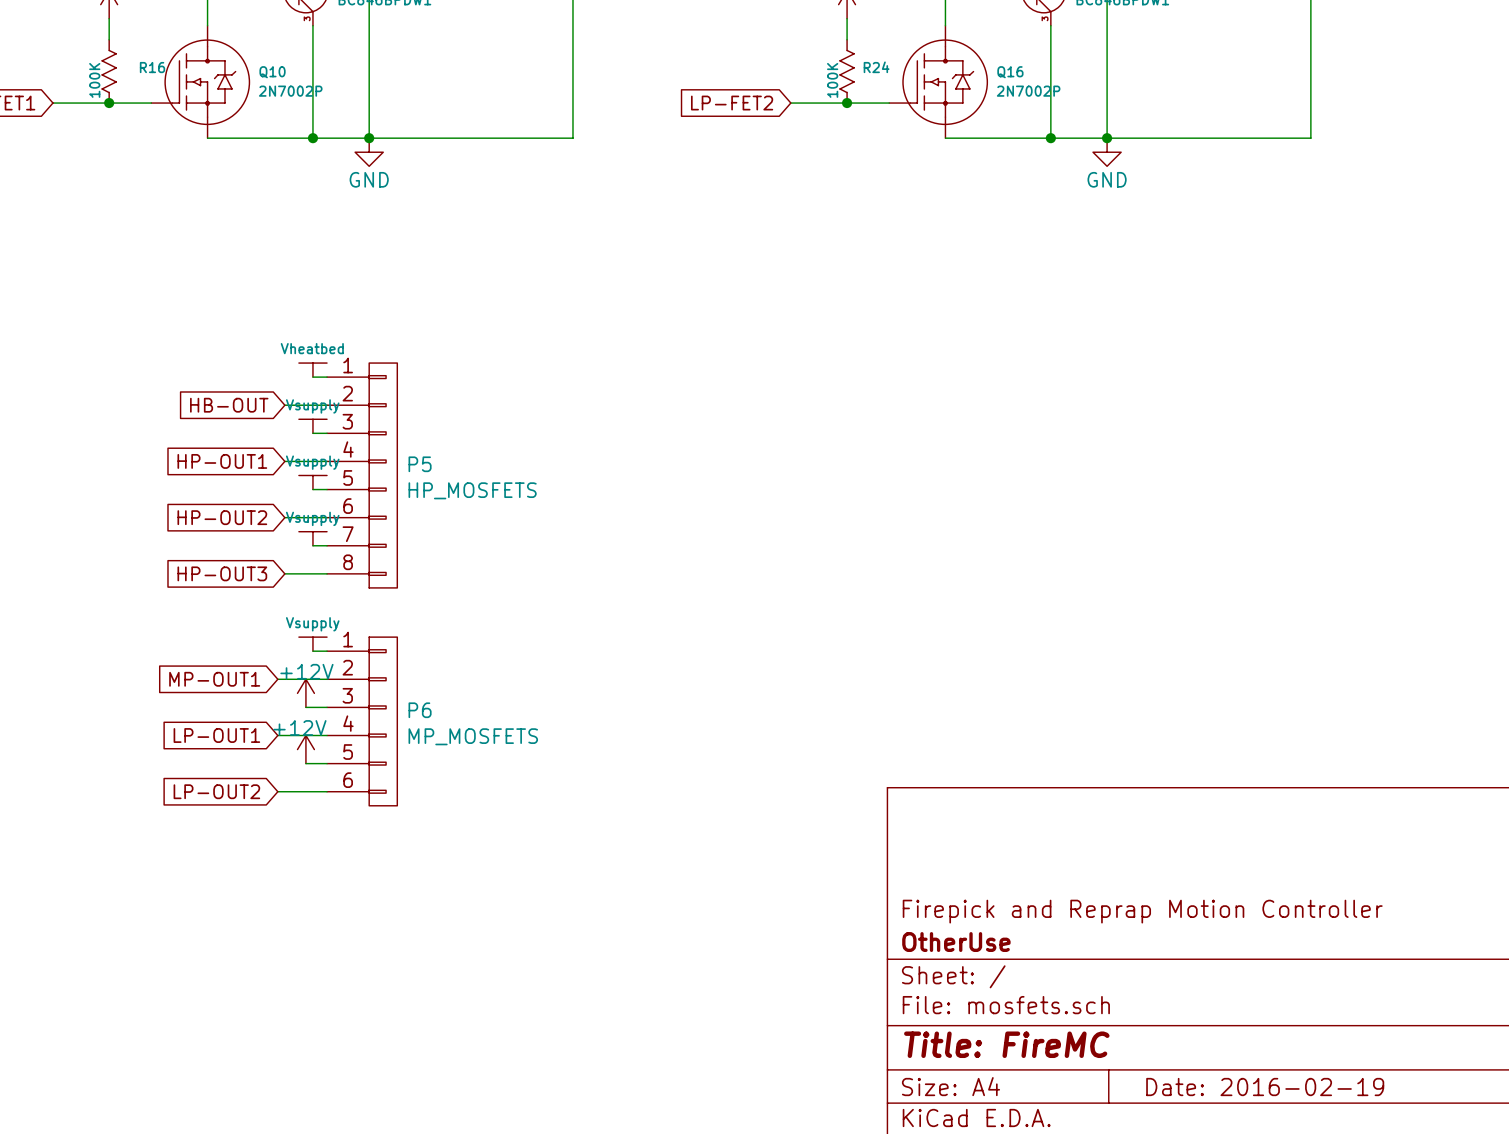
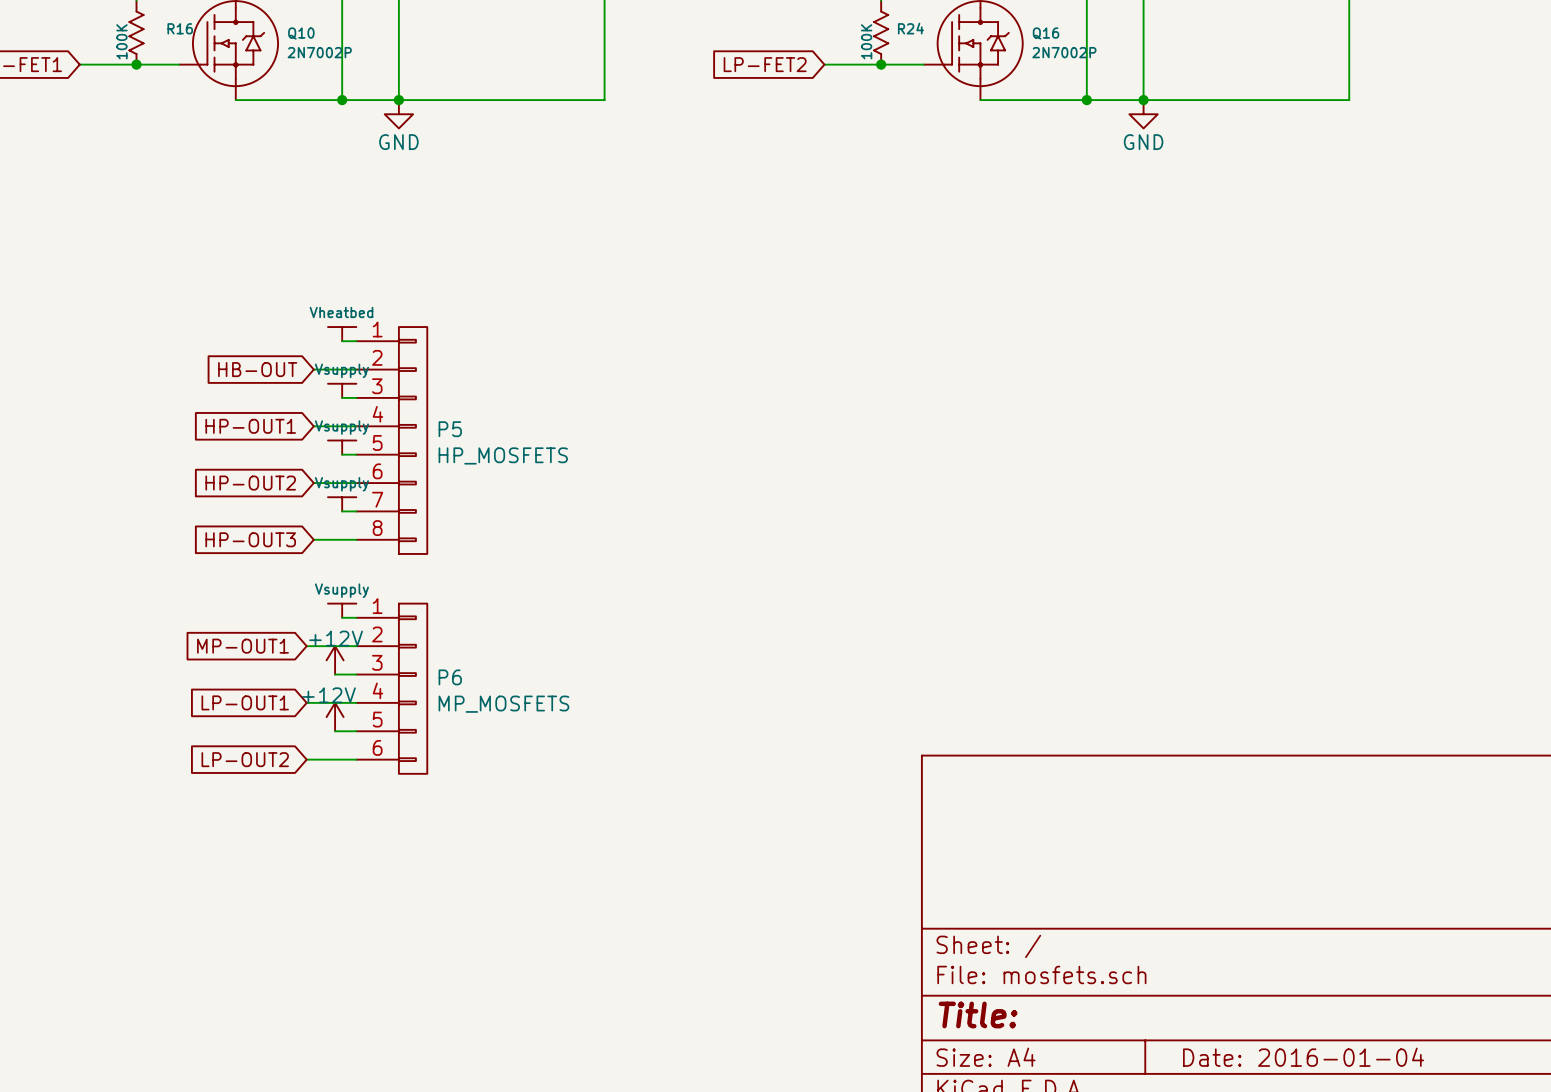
title block: Firepick and Reprap Motion Controller (1142, 911) -> none
title block: OtherUse (956, 942) -> none
title block: Title: FireMC (1006, 1044) -> Title: (978, 1014)
title block: Date: 2016-02-19 (1265, 1087) -> Date: 2016-01-04 (1303, 1057)

